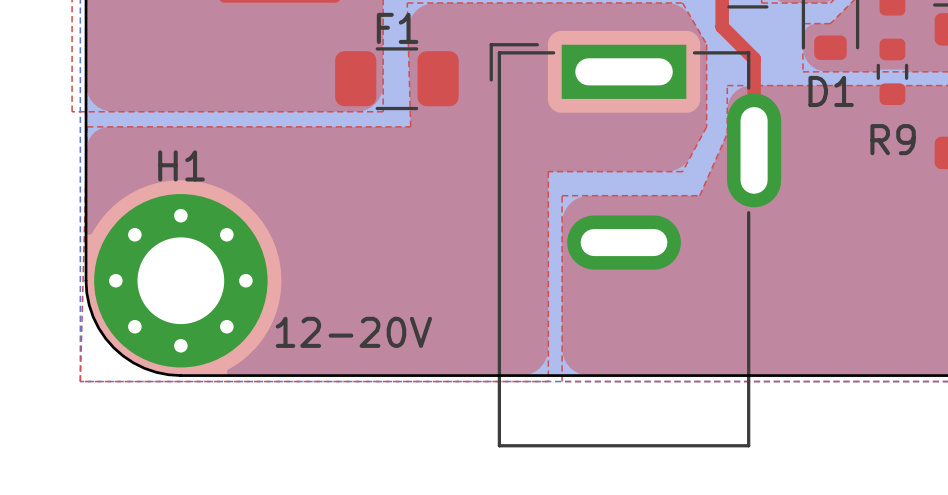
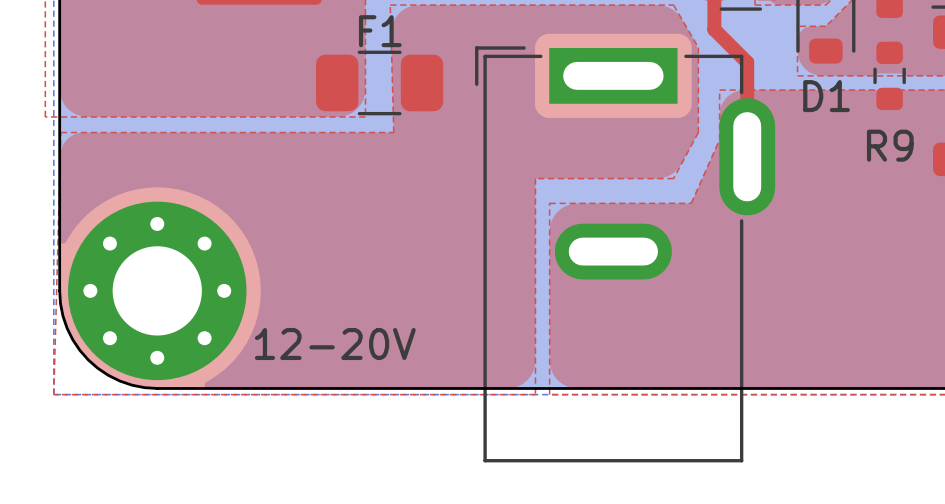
H1 name: H1 (181, 165) -> none

